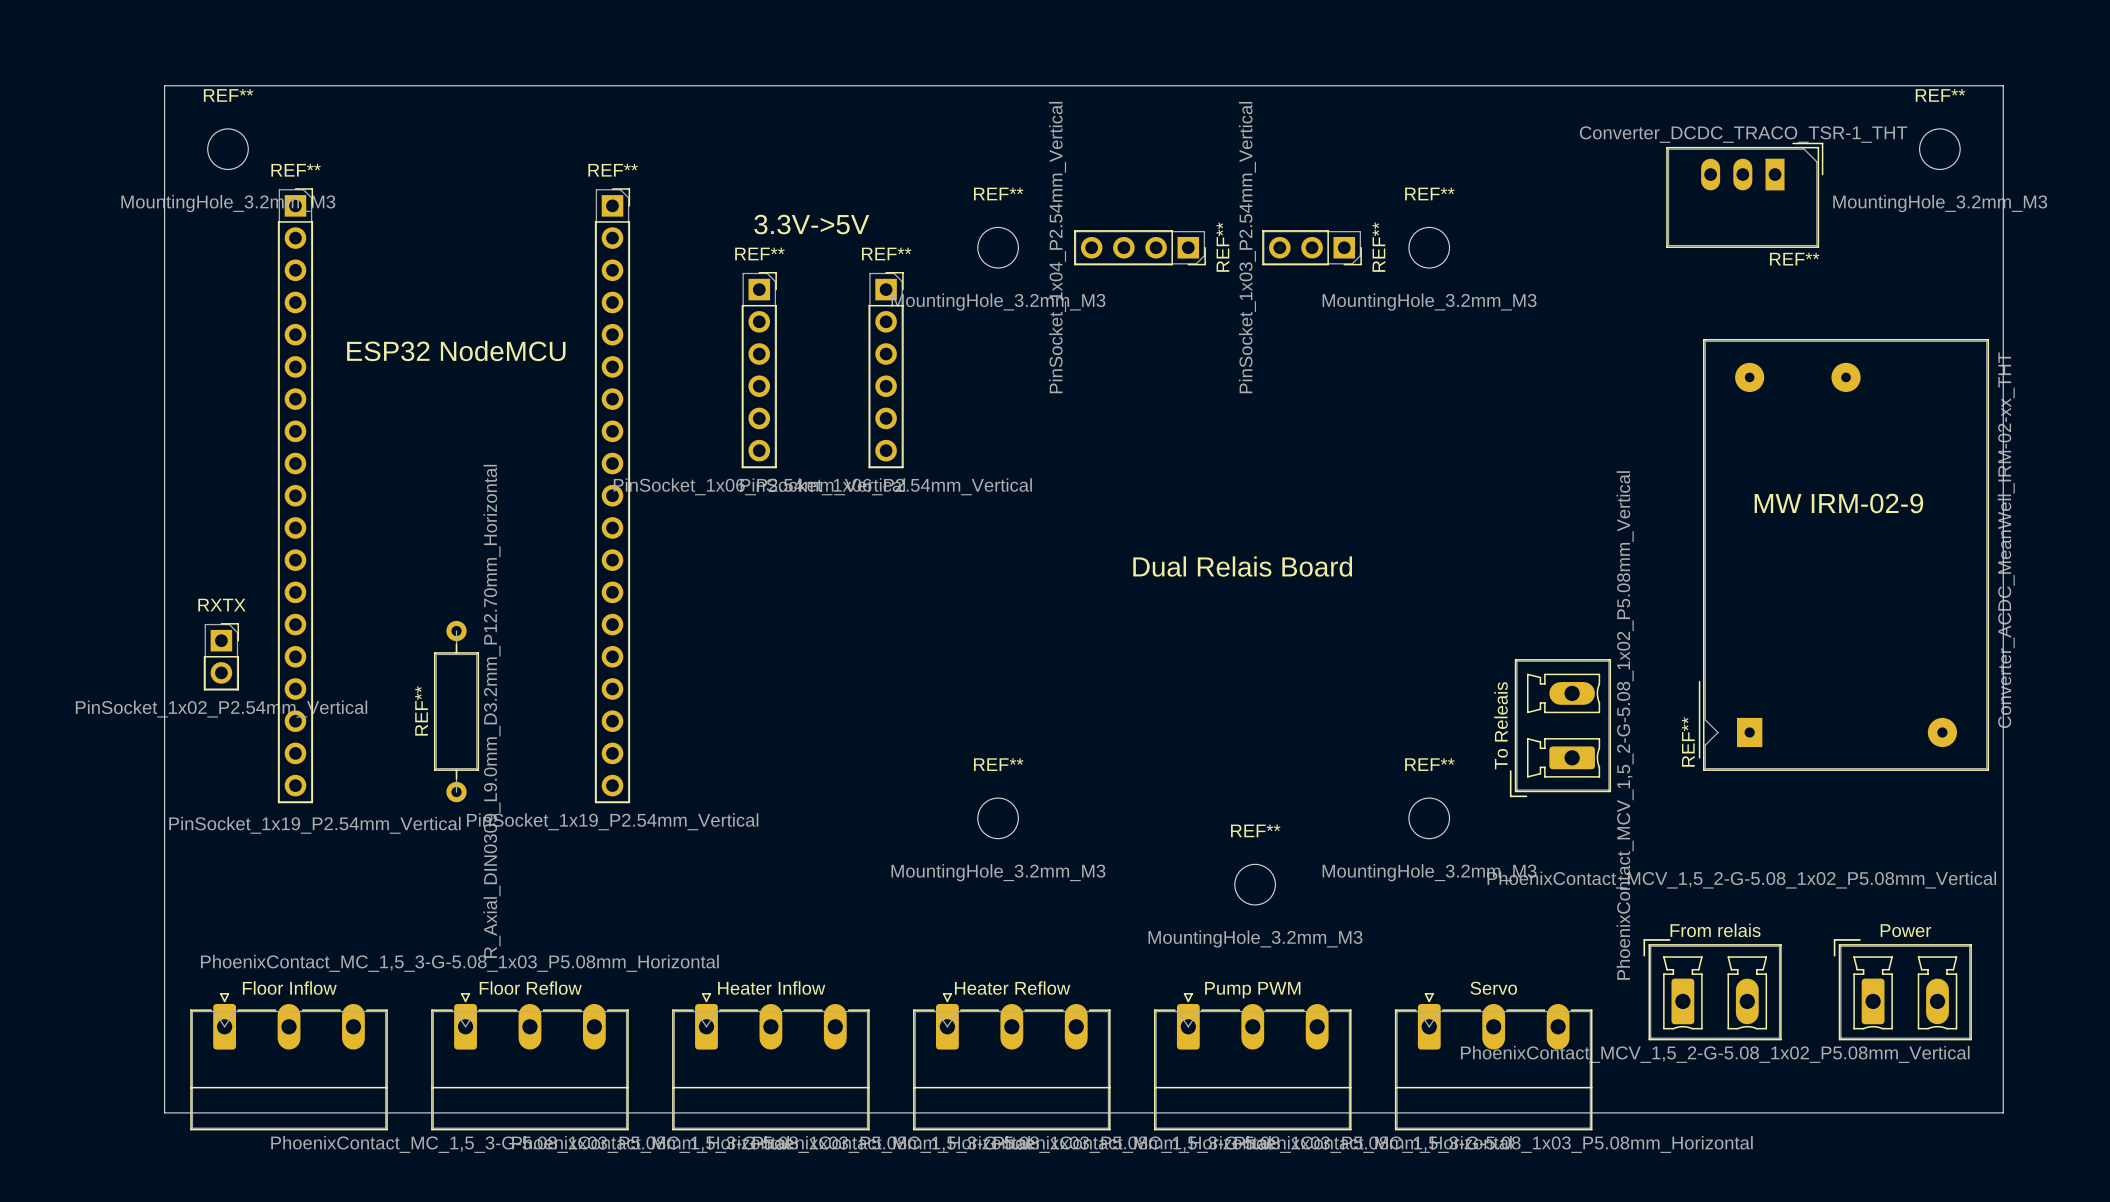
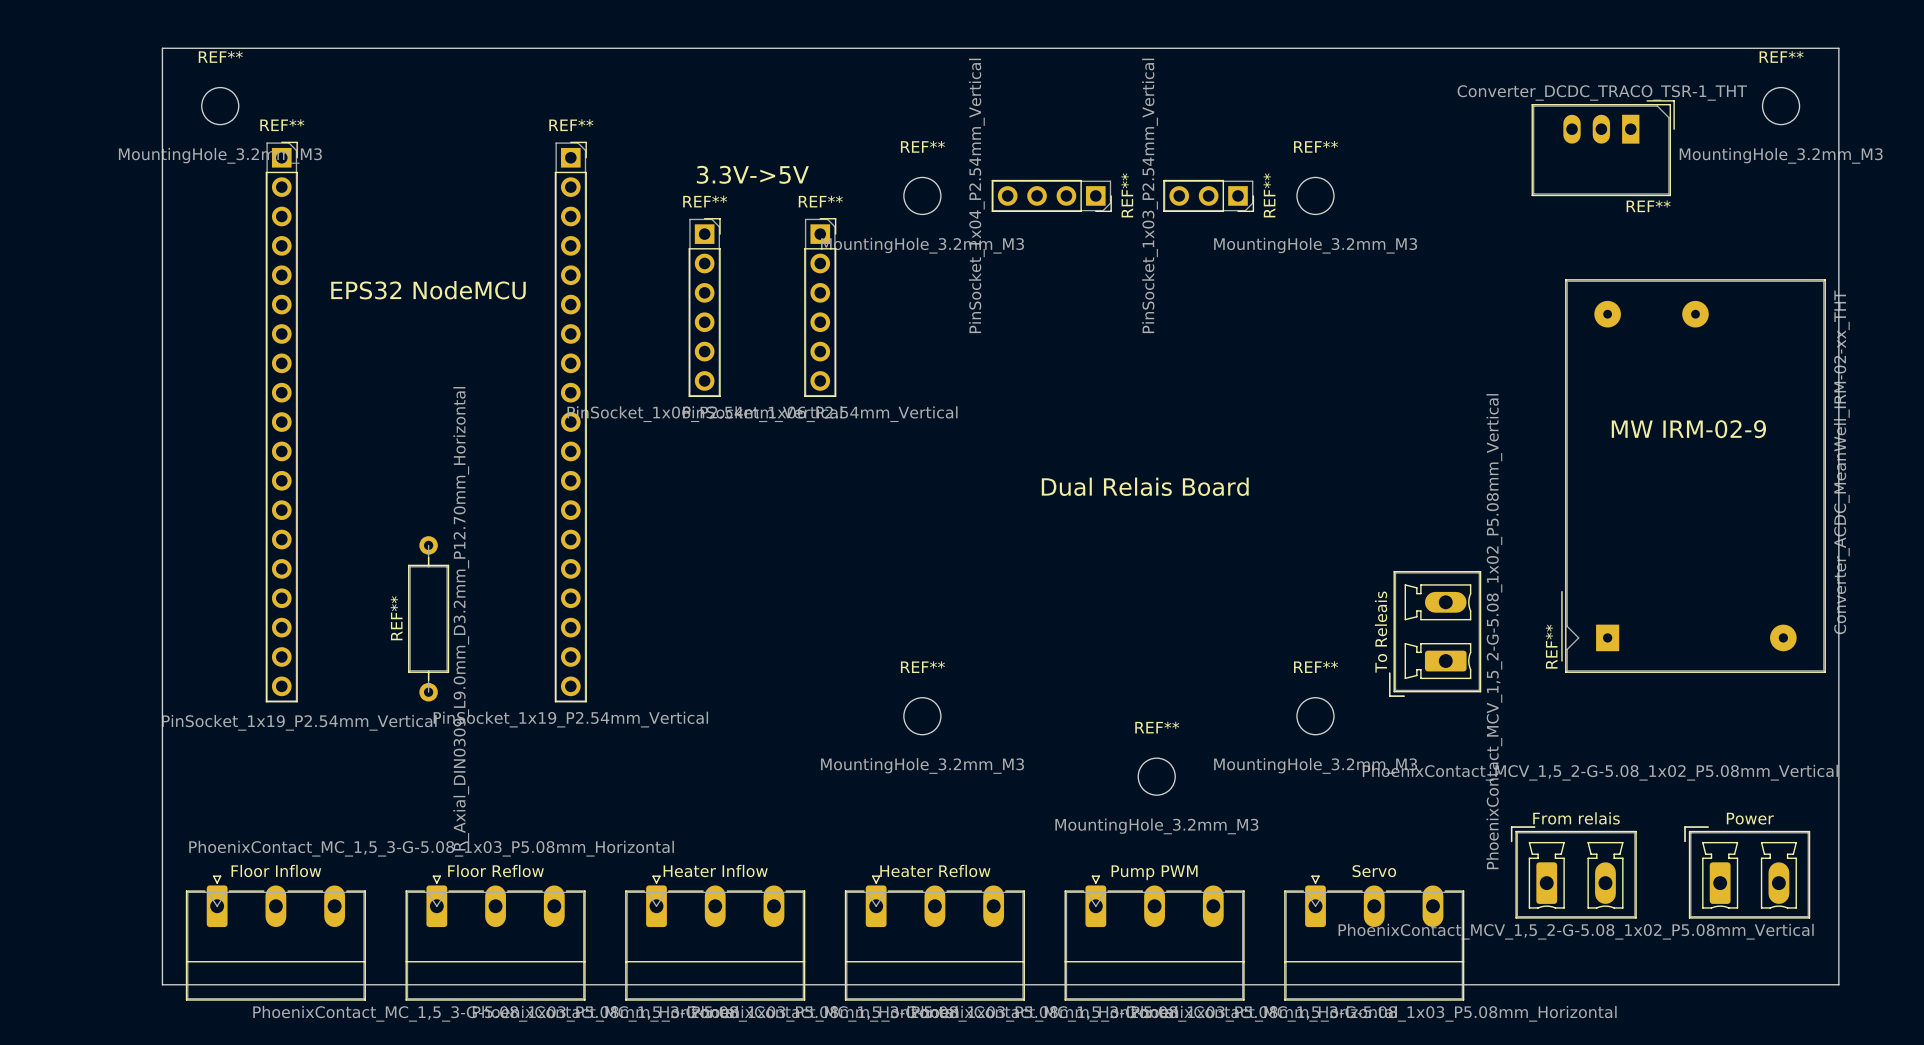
text: ESP32 NodeMCU (456, 350) -> EPS32 NodeMCU (428, 290)
RXTX: PinSocket_1x02_P2.54mm_Vertical (221, 656) -> none

